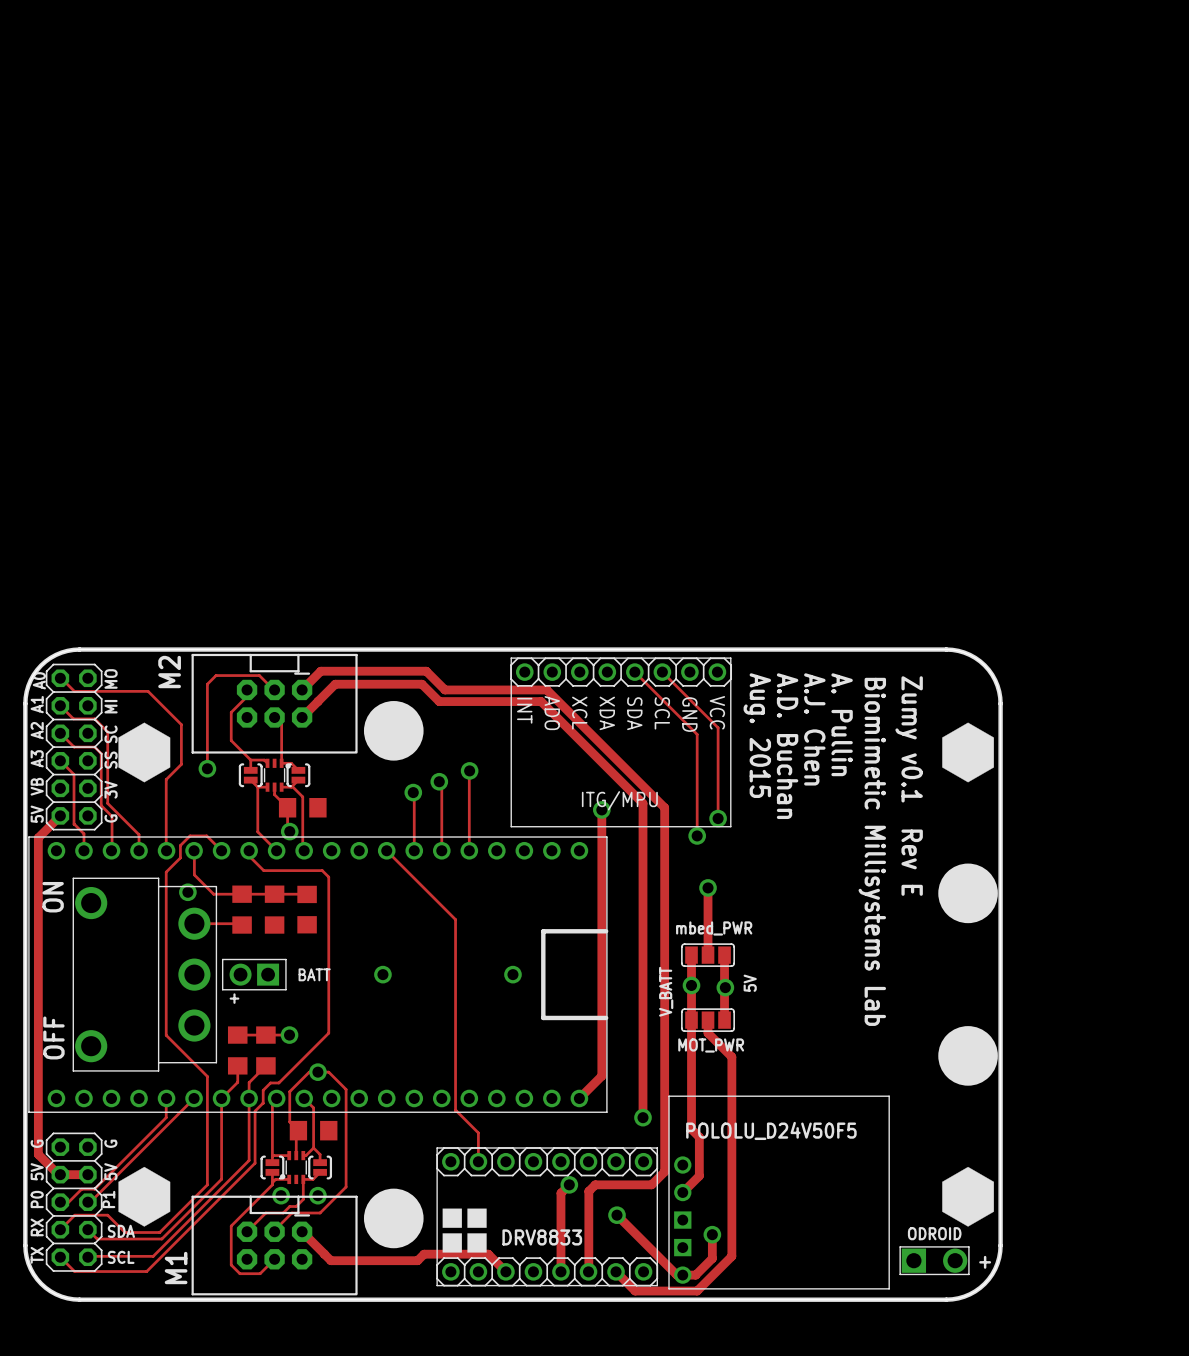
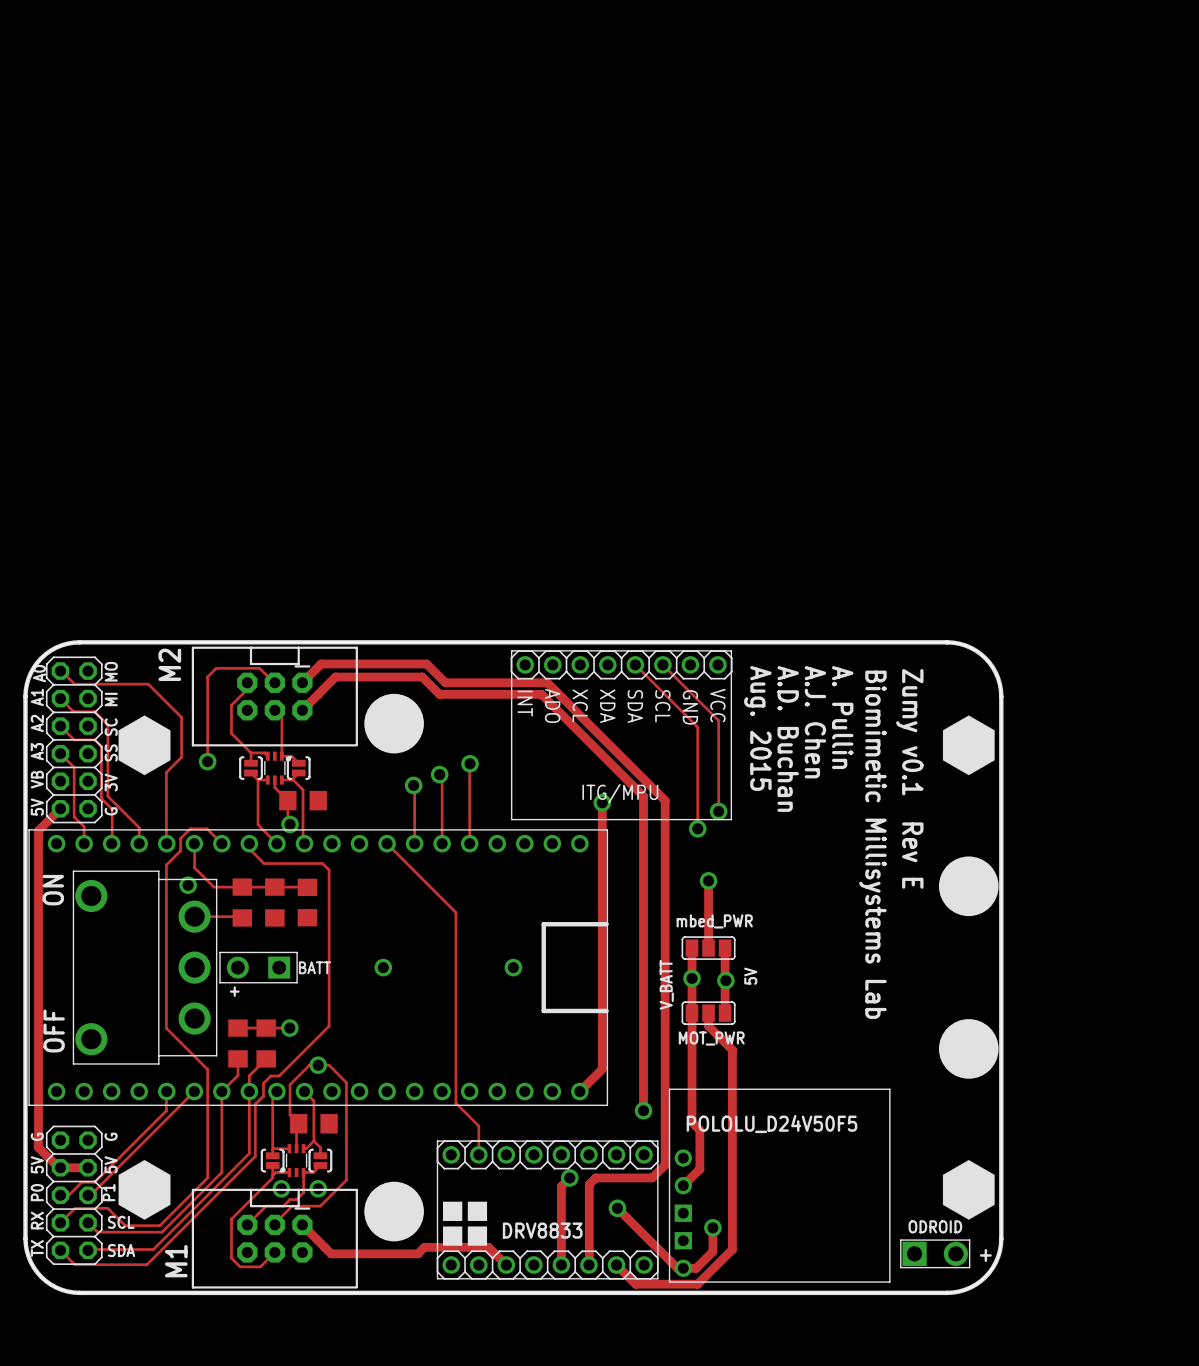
part footprint: [221, 958, 287, 991] -> [219, 951, 298, 984]
text: SDA (121, 1231) -> SCL (121, 1222)
text: SCL (121, 1257) -> SDA (121, 1250)

